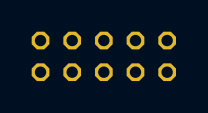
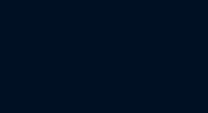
part: (103, 56) -> none

